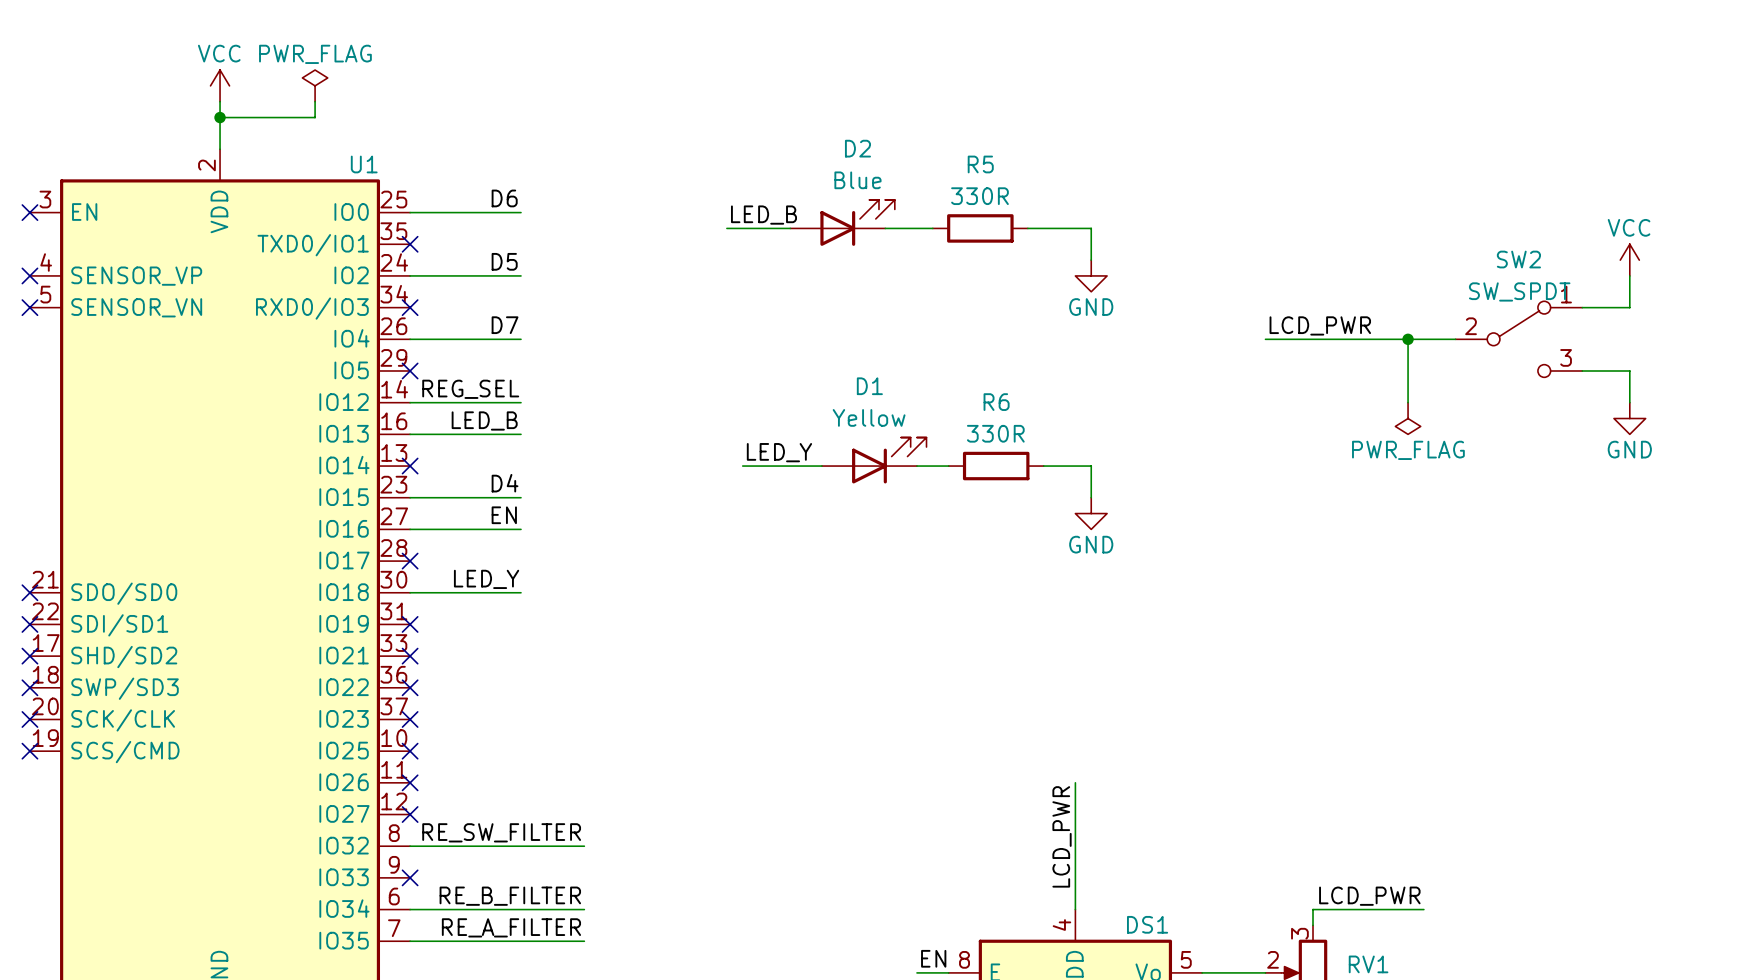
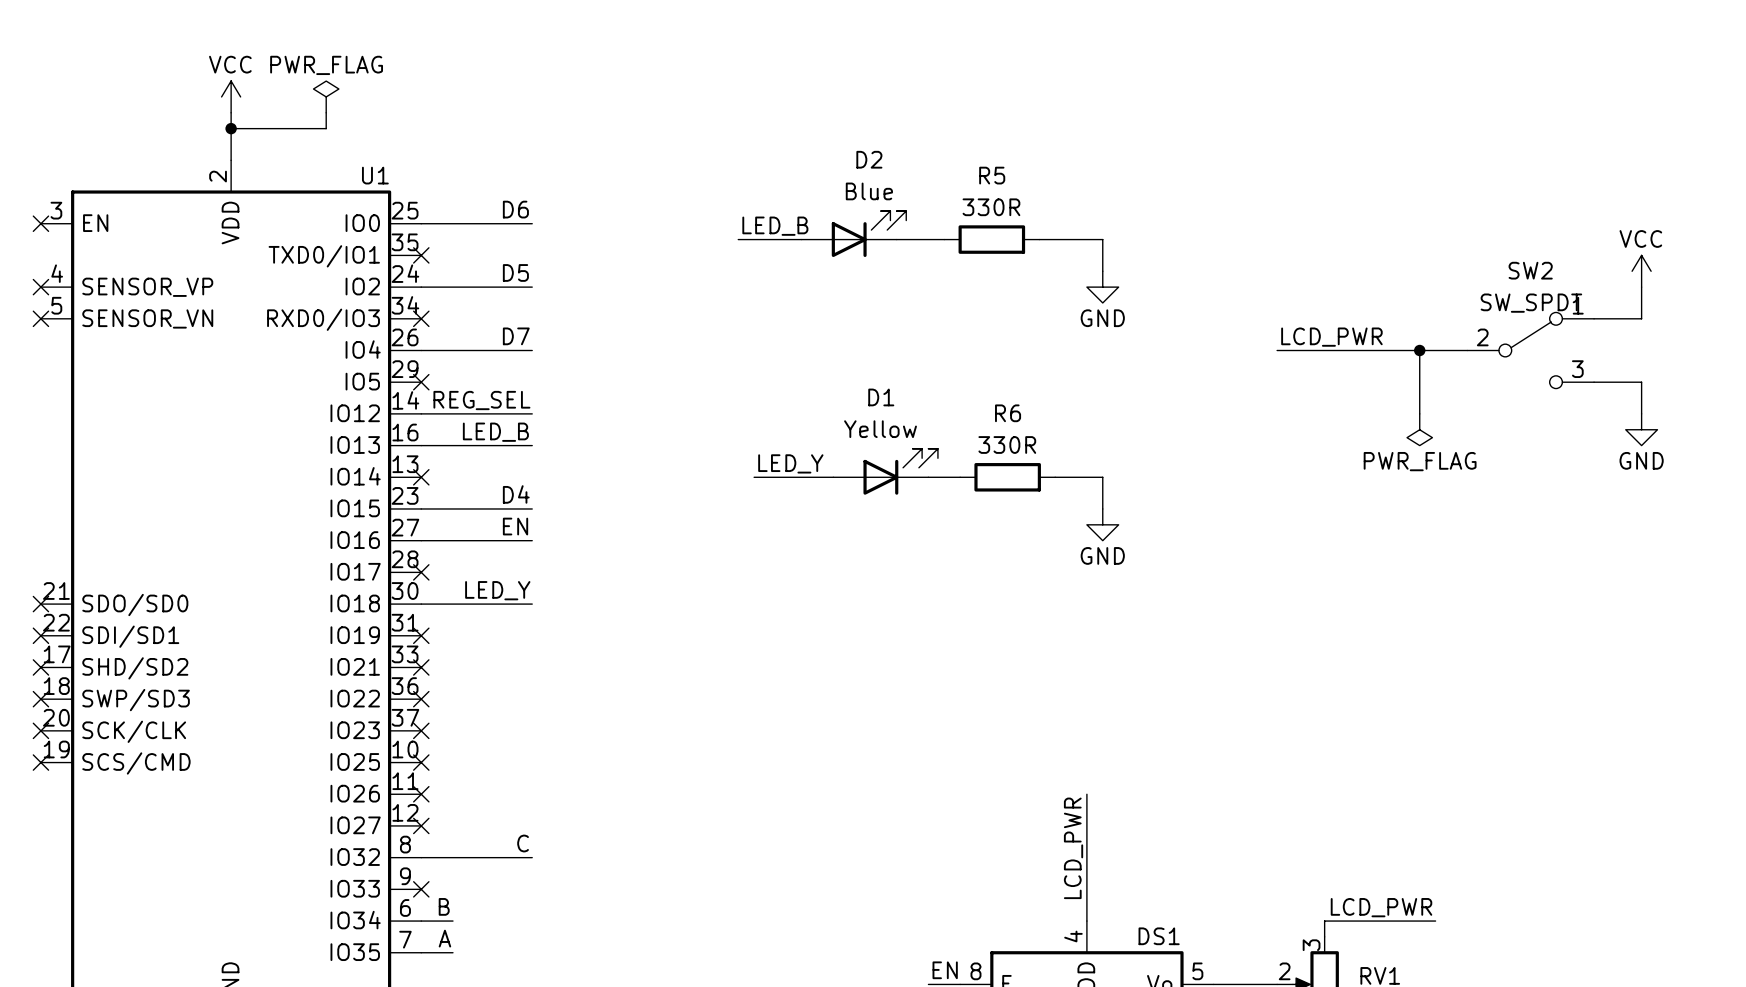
label: RE_SW_FILTER (501, 832) -> none
label: none -> C (523, 843)
wire: (520, 846) (584, 846) -> none
label: none -> B (444, 906)
label: RE_B_FILTER (510, 896) -> none
wire: (441, 909) (584, 909) -> none
label: none -> A (444, 938)
label: RE_A_FILTER (511, 927) -> none
wire: (441, 941) (584, 941) -> none

